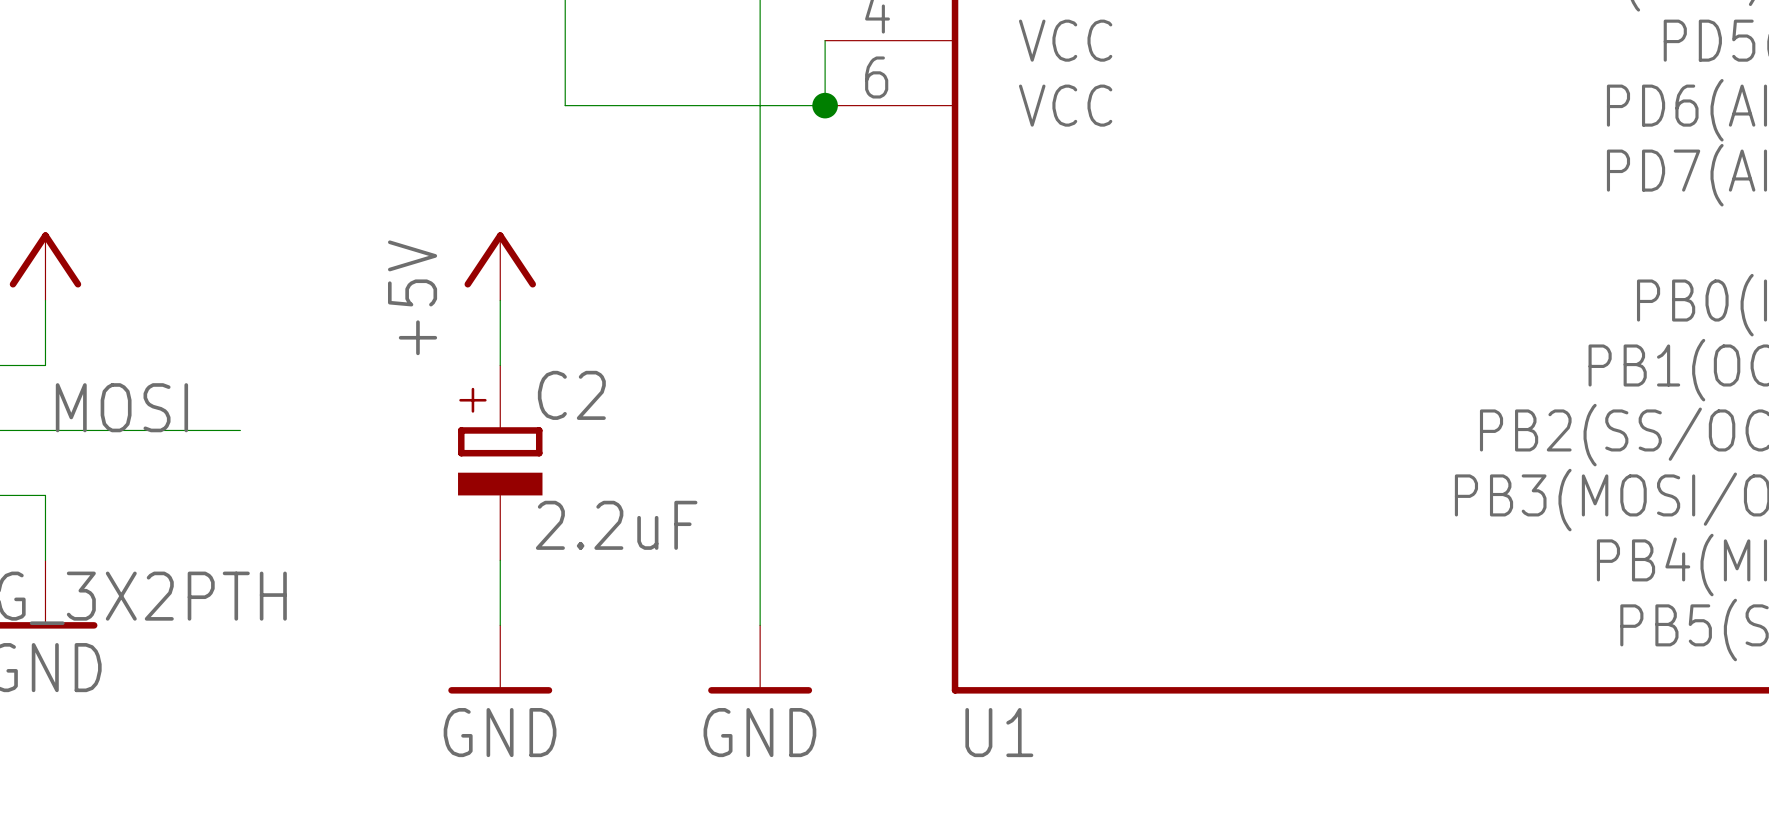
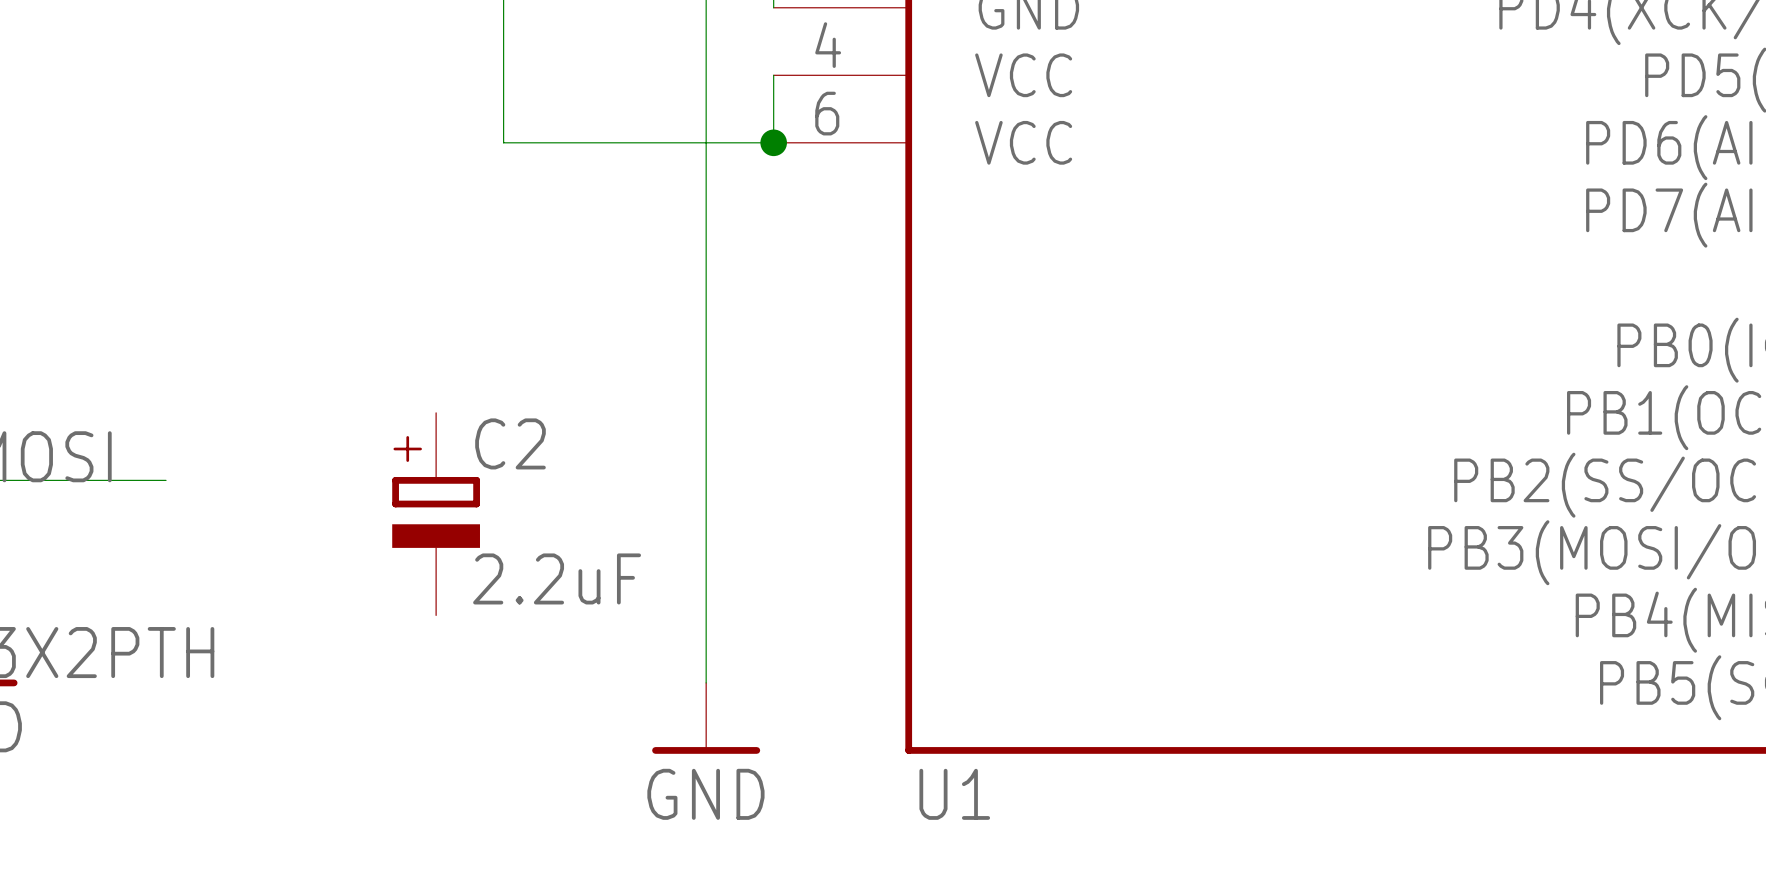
power symbol: +5V (500, 266) -> none
wire: (500, 300) (500, 365) -> none
wire: (500, 560) (500, 625) -> none
power symbol: GND (500, 659) -> none

